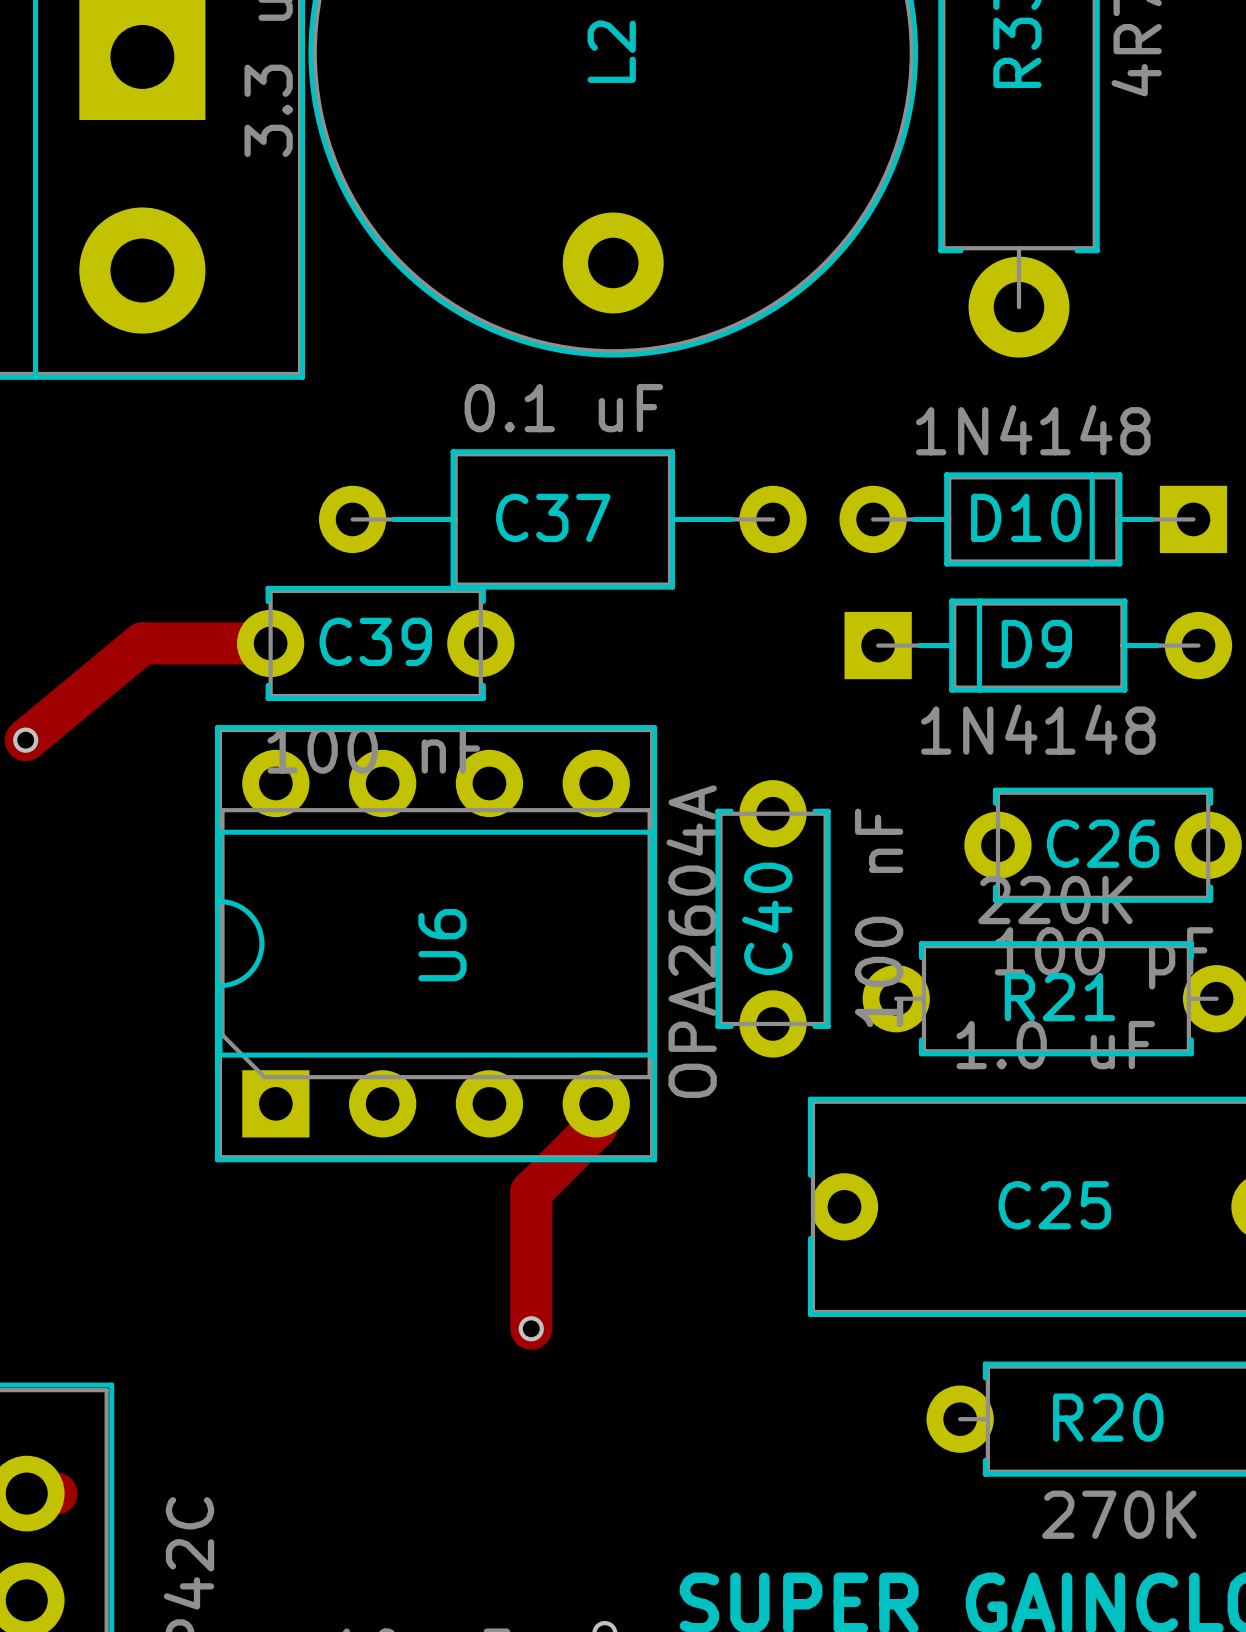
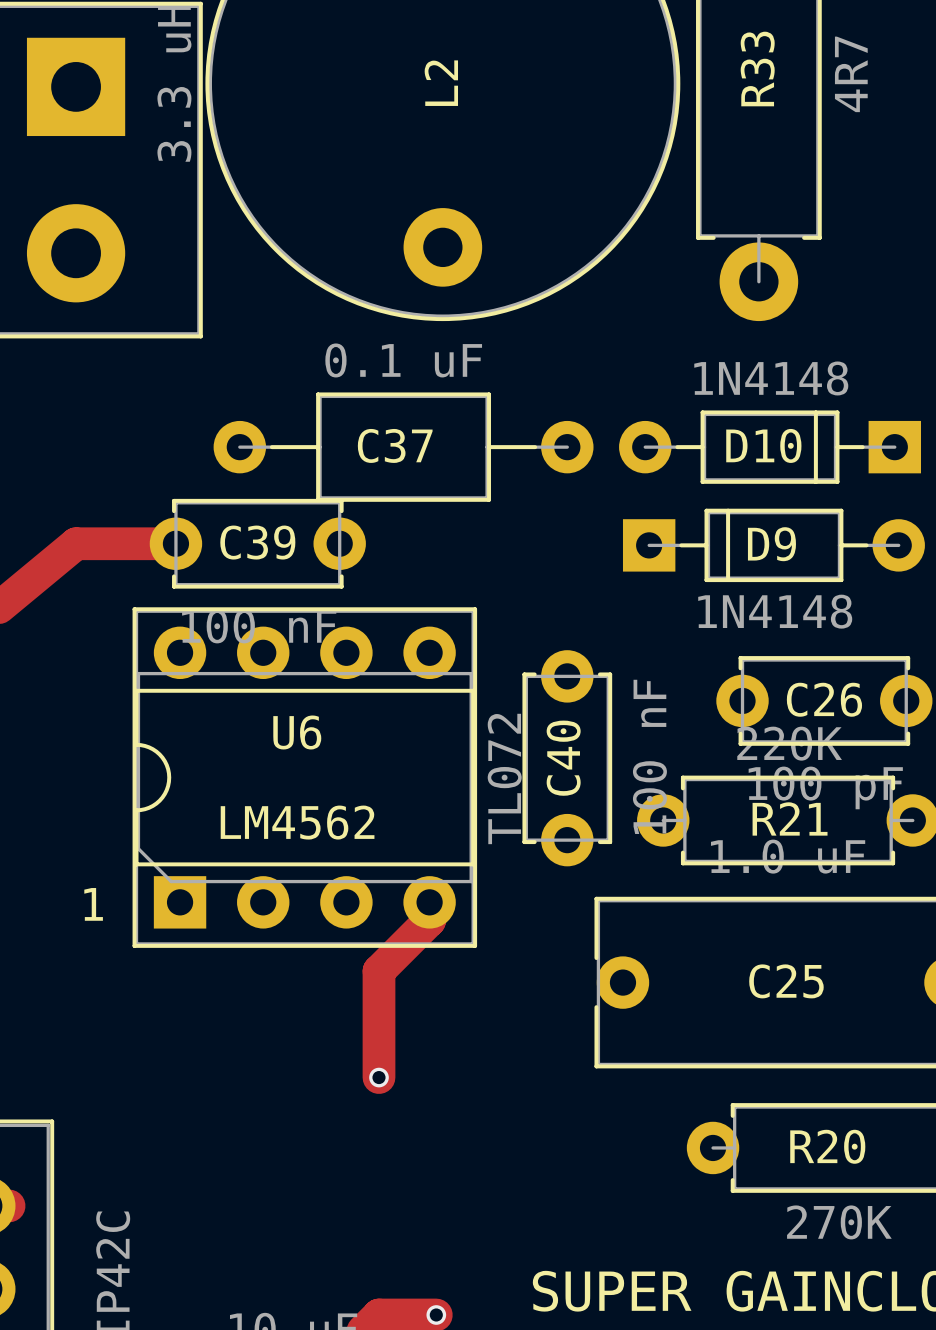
U6 value: OPA2604A (691, 941) -> TL072 (504, 778)
U6 name rotation: 0° (442, 945) -> 90° clockwise (297, 732)
text: none -> LM4562 (297, 822)
text: none -> 1 (93, 904)

